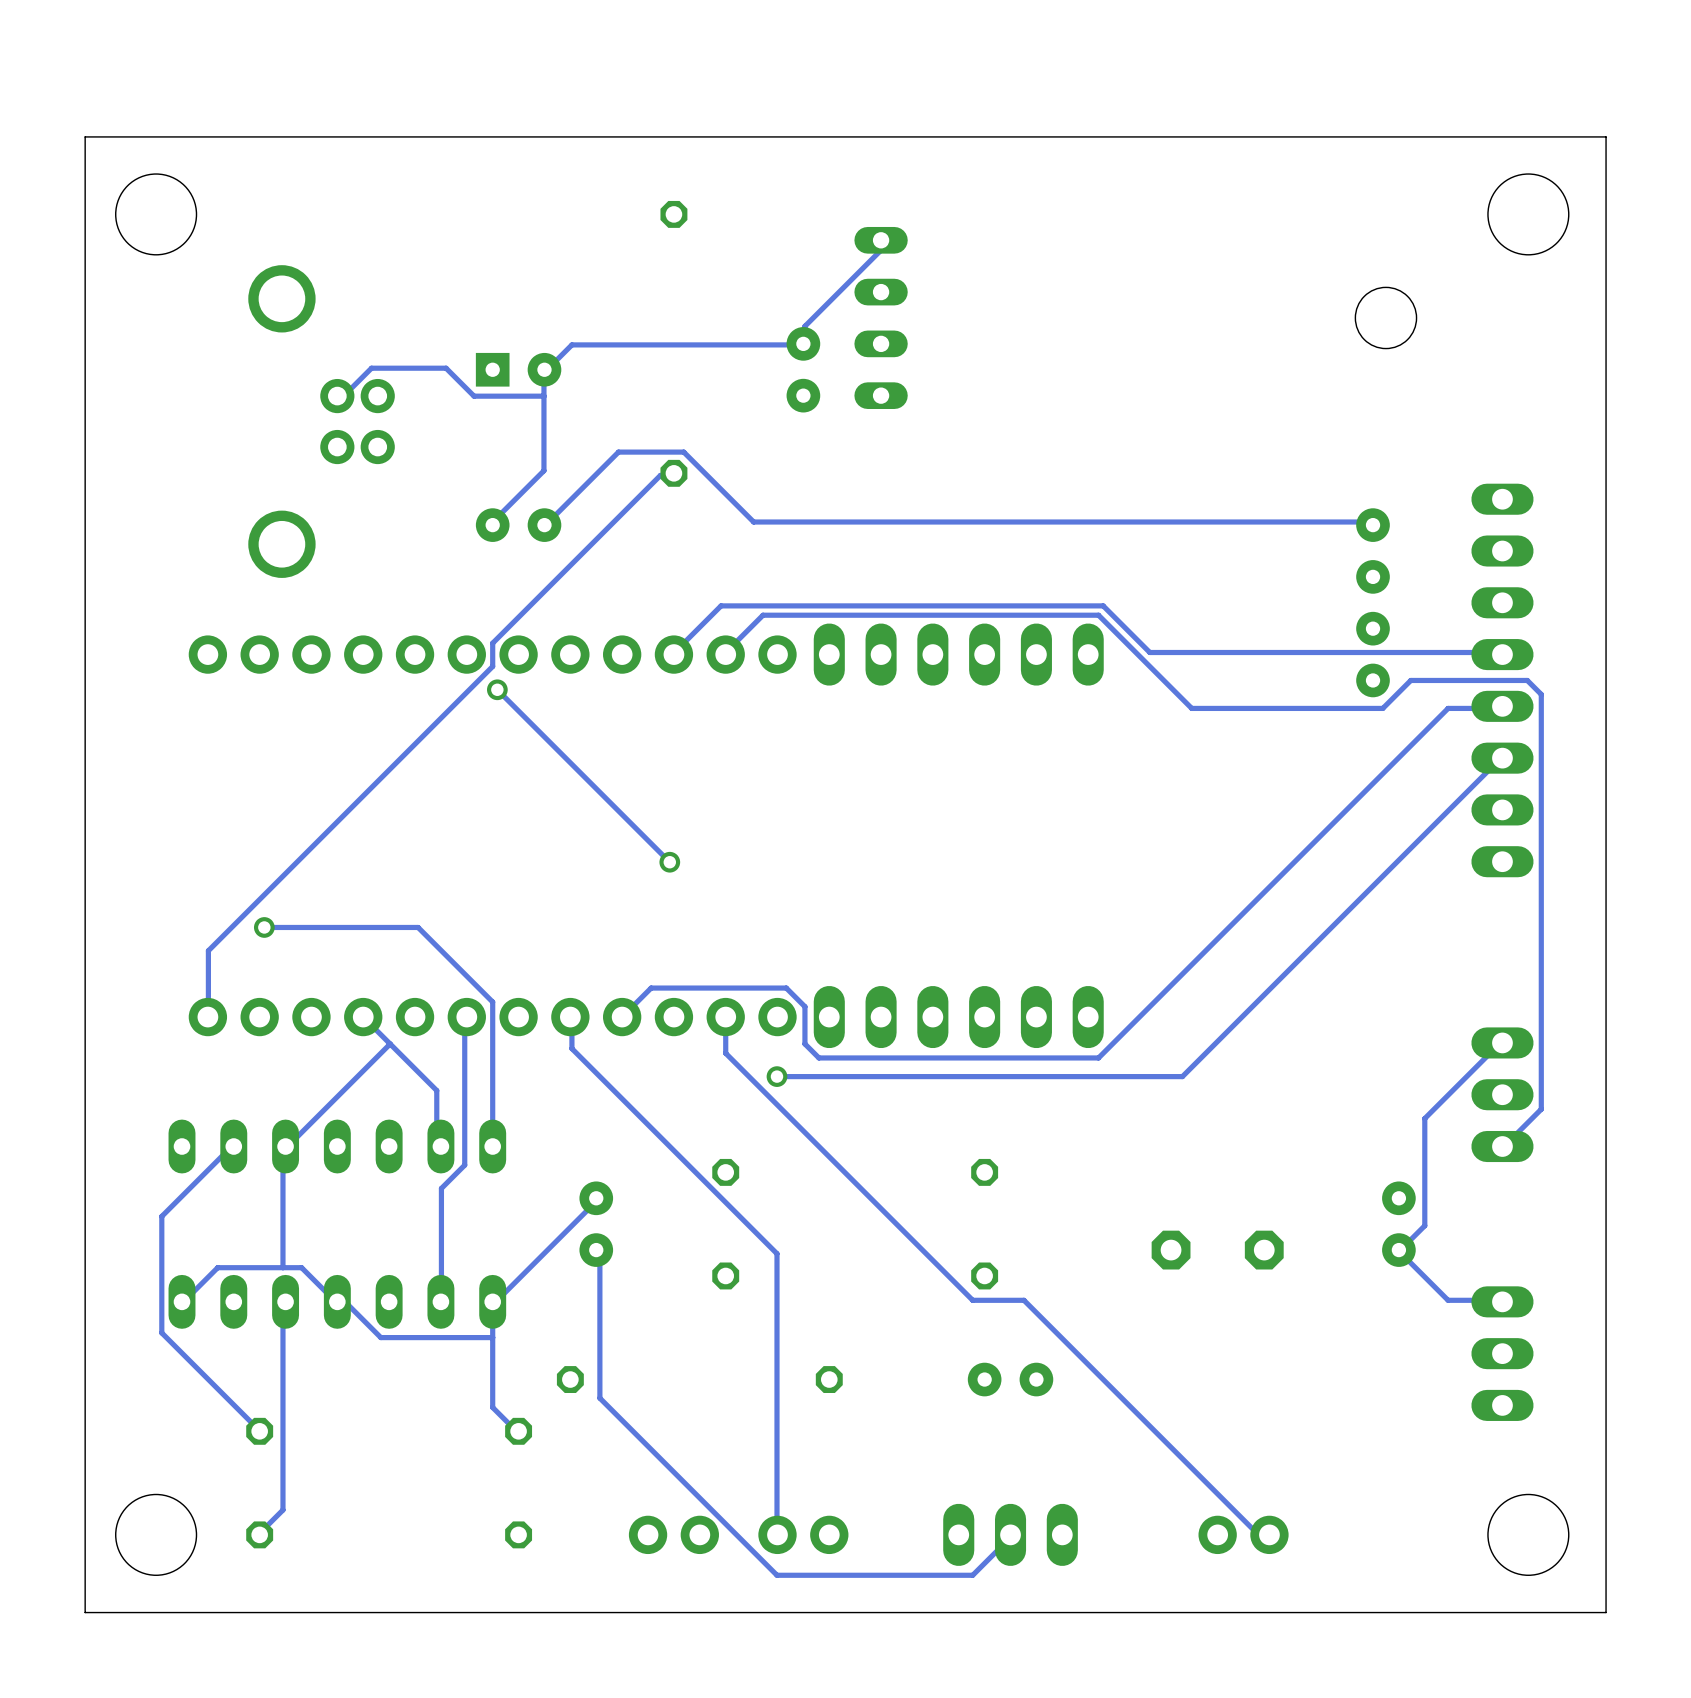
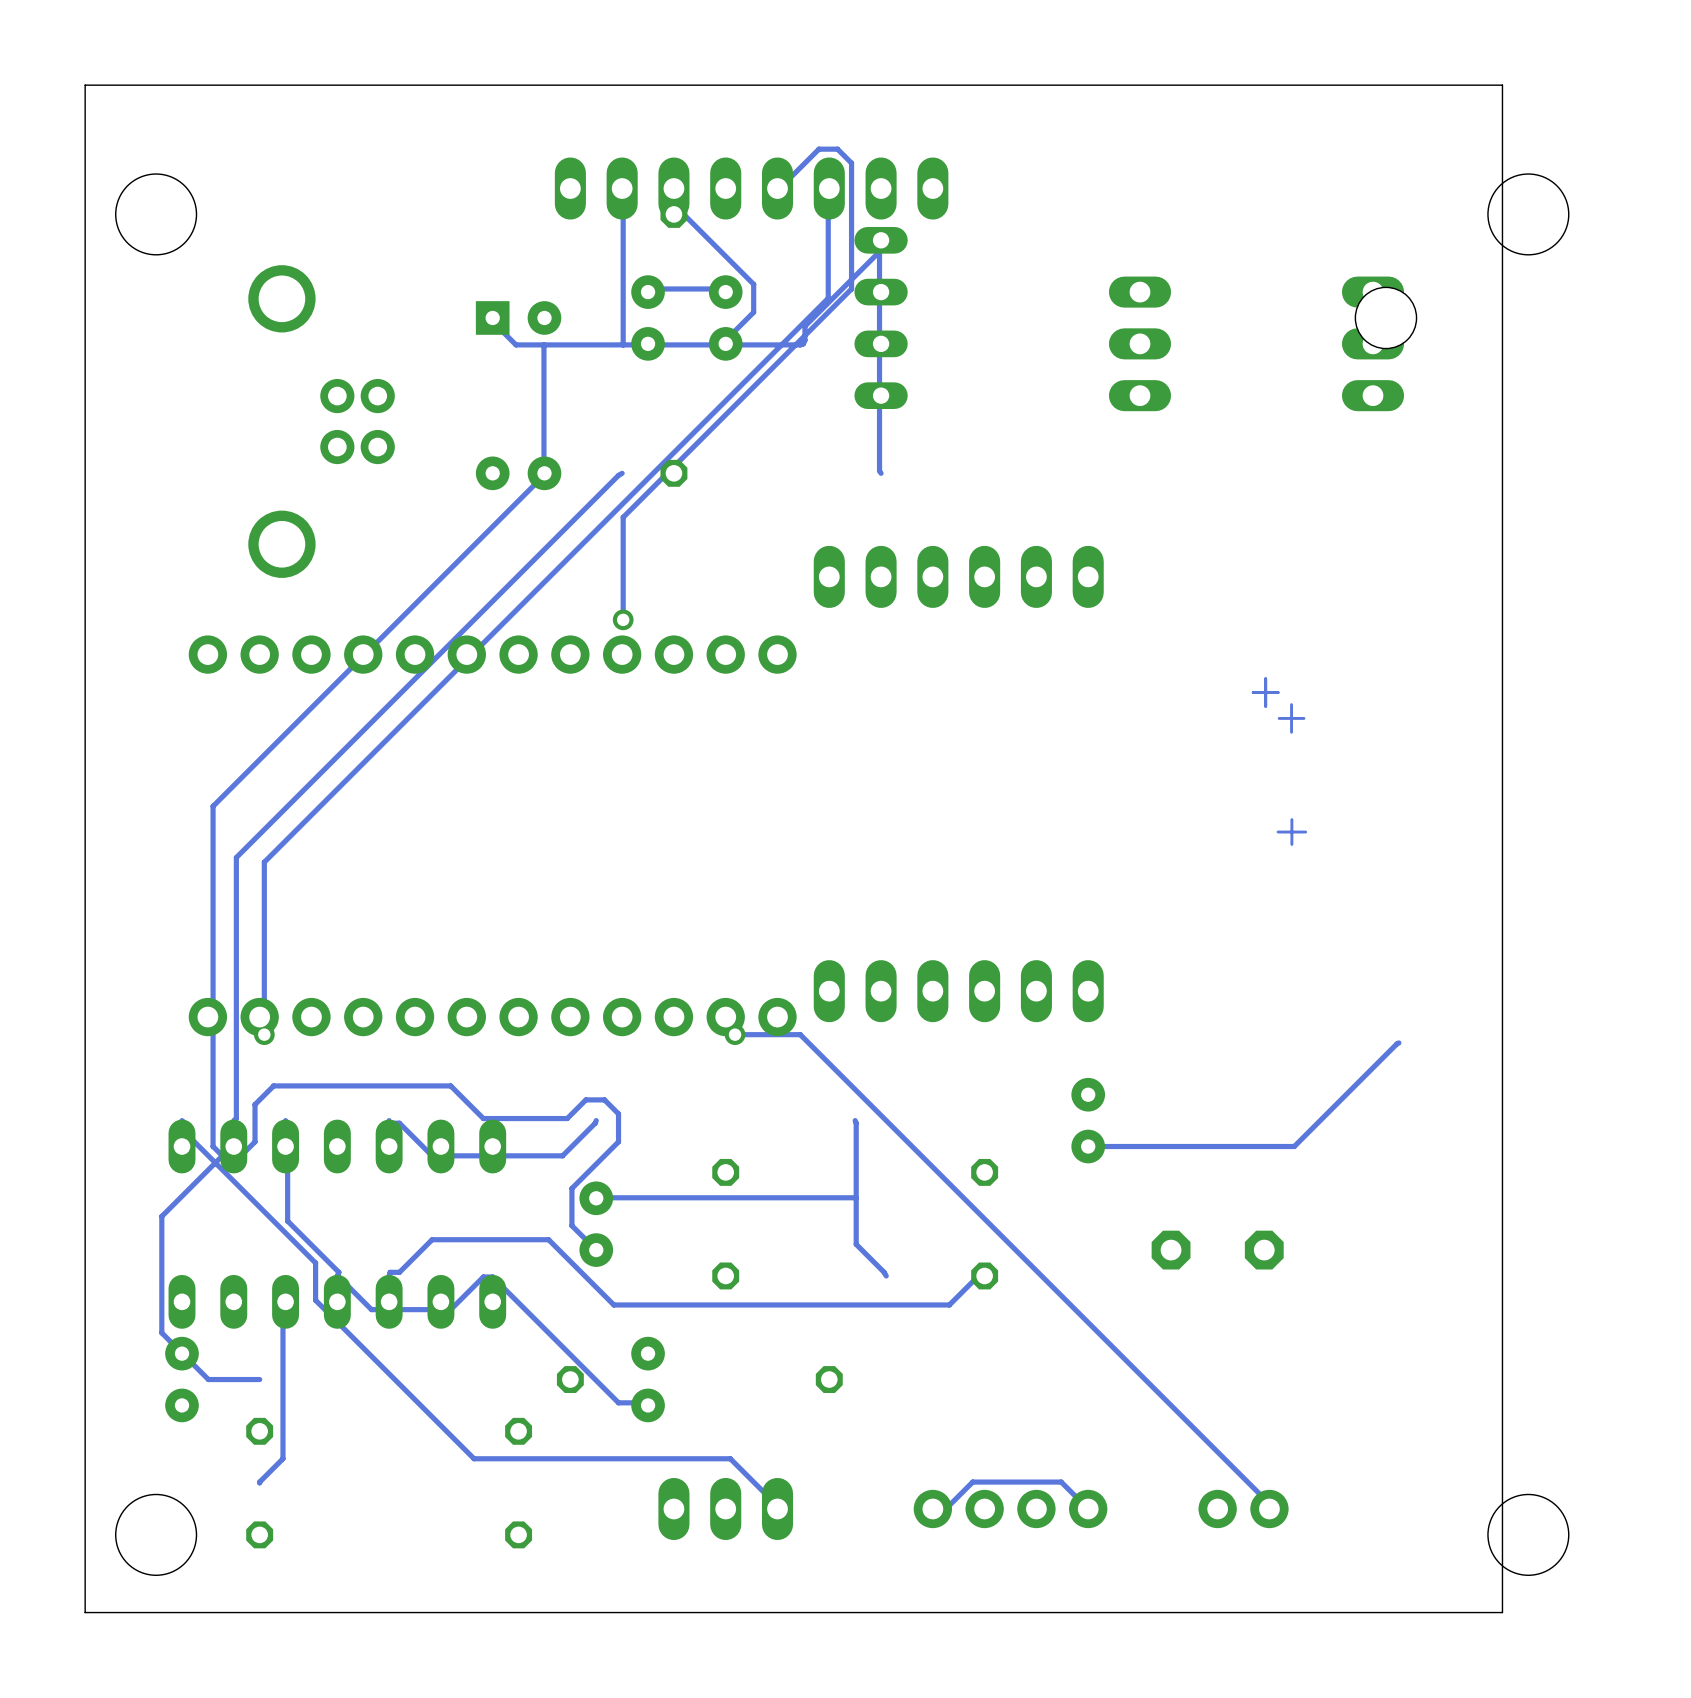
board edge: (85, 136) (1606, 136) (1606, 1612) (1502, 1612) -> (85, 136) (85, 85) (1502, 85) (1502, 1612)
track: none -> (622, 188) (623, 344)
track: none -> (673, 188) (674, 205) (753, 284) (753, 312) (725, 340) (725, 343)
part: none -> (751, 188)
track: none -> (777, 188) (818, 149) (837, 149) (851, 163) (851, 288) (623, 517) (623, 619)
track: none -> (829, 188) (828, 298) (264, 862) (264, 1034)
track: none -> (879, 251) (879, 470) (881, 473)
track: none -> (725, 292) (725, 288) (651, 288) (648, 292)
track: none -> (492, 317) (492, 321) (516, 344) (571, 344)
part: none -> (648, 317)
part: none -> (725, 317)
part: none -> (1139, 343)
part: none -> (1373, 343)
track: (571, 344) (548, 368) (544, 369) (543, 372) -> (543, 344) (543, 372)
part position: (518, 369) -> (518, 317)
part: (803, 369) -> none
track: (337, 396) (338, 391) (348, 391) (371, 368) (446, 368) (474, 396) (543, 396) -> none
track: (543, 470) (492, 522) (492, 525) -> (543, 470) (543, 475) (213, 806) (213, 1146) (222, 1155) (241, 1155) (255, 1141) (255, 1104) (273, 1085) (450, 1085) (483, 1118) (567, 1118) (585, 1099) (604, 1099) (618, 1113) (618, 1141) (571, 1188) (571, 1225) (596, 1250)
track: none -> (622, 473) (236, 857) (236, 1118) (233, 1120)
track: (673, 473) (660, 475) (492, 643) (492, 666) (208, 950) (207, 1017) -> none
part position: (518, 525) -> (518, 473)
track: (1373, 525) (1368, 522) (753, 522) (683, 452) (618, 452) (544, 525) -> none
part: (1373, 551) -> none
via: none -> (623, 619)
track: (725, 654) (763, 615) (1098, 615) (1191, 708) (1382, 708) (1410, 680) (1527, 680) (1541, 694) (1541, 1109) (1502, 1146) -> none
part position: (958, 654) -> (958, 576)
part: (1373, 654) -> none
track: (1502, 654) (1499, 652) (1149, 652) (1103, 605) (721, 605) (673, 654) -> none
part: (1502, 680) -> none
track: (497, 689) (669, 862) -> none
via: (497, 689) -> none
text: none -> + (1265, 692)
track: (1502, 706) (1499, 708) (1448, 708) (1098, 1057) (818, 1057) (804, 1043) (804, 1006) (786, 988) (651, 988) (622, 1017) -> none
text: none -> + (1291, 718)
track: (1502, 758) (1182, 1076) (776, 1076) -> none
text: none -> + (1291, 832)
via: (669, 862) -> none
track: (264, 927) (418, 927) (492, 1002) (492, 1118) -> none
via position: (264, 927) -> (264, 1034)
track: (363, 1017) (436, 1090) (436, 1146) (440, 1146) -> none
track: (466, 1017) (464, 1020) (464, 1165) (441, 1188) (440, 1301) -> none
track: (570, 1017) (571, 1048) (776, 1253) (777, 1534) -> none
track: (725, 1017) (725, 1053) (972, 1300) (1023, 1300) (1257, 1533) (1269, 1534) -> none
part position: (958, 1017) -> (958, 991)
track: none -> (735, 1034) (800, 1034) (1271, 1505) (1269, 1508)
track: none -> (1398, 1042) (1294, 1146) (1088, 1146)
track: (1502, 1042) (1424, 1118) (1424, 1225) (1398, 1250) (1448, 1300) (1502, 1301) -> none
track: (390, 1043) (287, 1146) (282, 1146) (282, 1267) -> none
via position: (776, 1076) -> (735, 1034)
part: (1502, 1094) -> none
track: none -> (182, 1120) (185, 1123) (185, 1132) (315, 1263) (315, 1300) (474, 1458) (730, 1458) (776, 1505) (777, 1508)
track: none -> (285, 1120) (287, 1123) (287, 1221) (338, 1272) (337, 1275) (371, 1309) (450, 1309) (483, 1277) (492, 1277) (618, 1402) (646, 1402) (648, 1405)
track: none -> (596, 1120) (562, 1155) (432, 1155) (399, 1123) (390, 1123) (389, 1120)
track: none -> (855, 1120) (856, 1244) (886, 1275)
part: none -> (1088, 1120)
track: (596, 1198) (595, 1202) (492, 1304) -> (596, 1198) (856, 1197)
part: (1398, 1224) -> none
track: (596, 1250) (599, 1253) (599, 1398) (776, 1575) (972, 1575) (1010, 1537) (1010, 1534) -> none
track: none -> (979, 1275) (949, 1304) (613, 1304) (548, 1239) (432, 1239) (399, 1272) (390, 1272) (389, 1275)
track: (182, 1301) (217, 1267) (301, 1267) (338, 1304) (348, 1304) (380, 1337) (492, 1337) -> none
track: (492, 1301) (492, 1407) (518, 1431) -> none
part: (1502, 1353) -> none
part: none -> (182, 1379)
track: (208, 1379) (259, 1431) -> (208, 1379) (259, 1379)
part: none -> (648, 1379)
part: (1010, 1379) -> none
track: (282, 1458) (282, 1510) (259, 1534) -> (282, 1458) (259, 1483)
part: none -> (958, 1508)
part: none -> (1062, 1508)
track: none -> (1088, 1508) (1061, 1482) (972, 1482) (949, 1505) (935, 1505) (932, 1508)
part: (673, 1534) -> none
part: (803, 1534) -> none
part position: (1010, 1534) -> (725, 1508)
part position: (1243, 1534) -> (1243, 1508)

